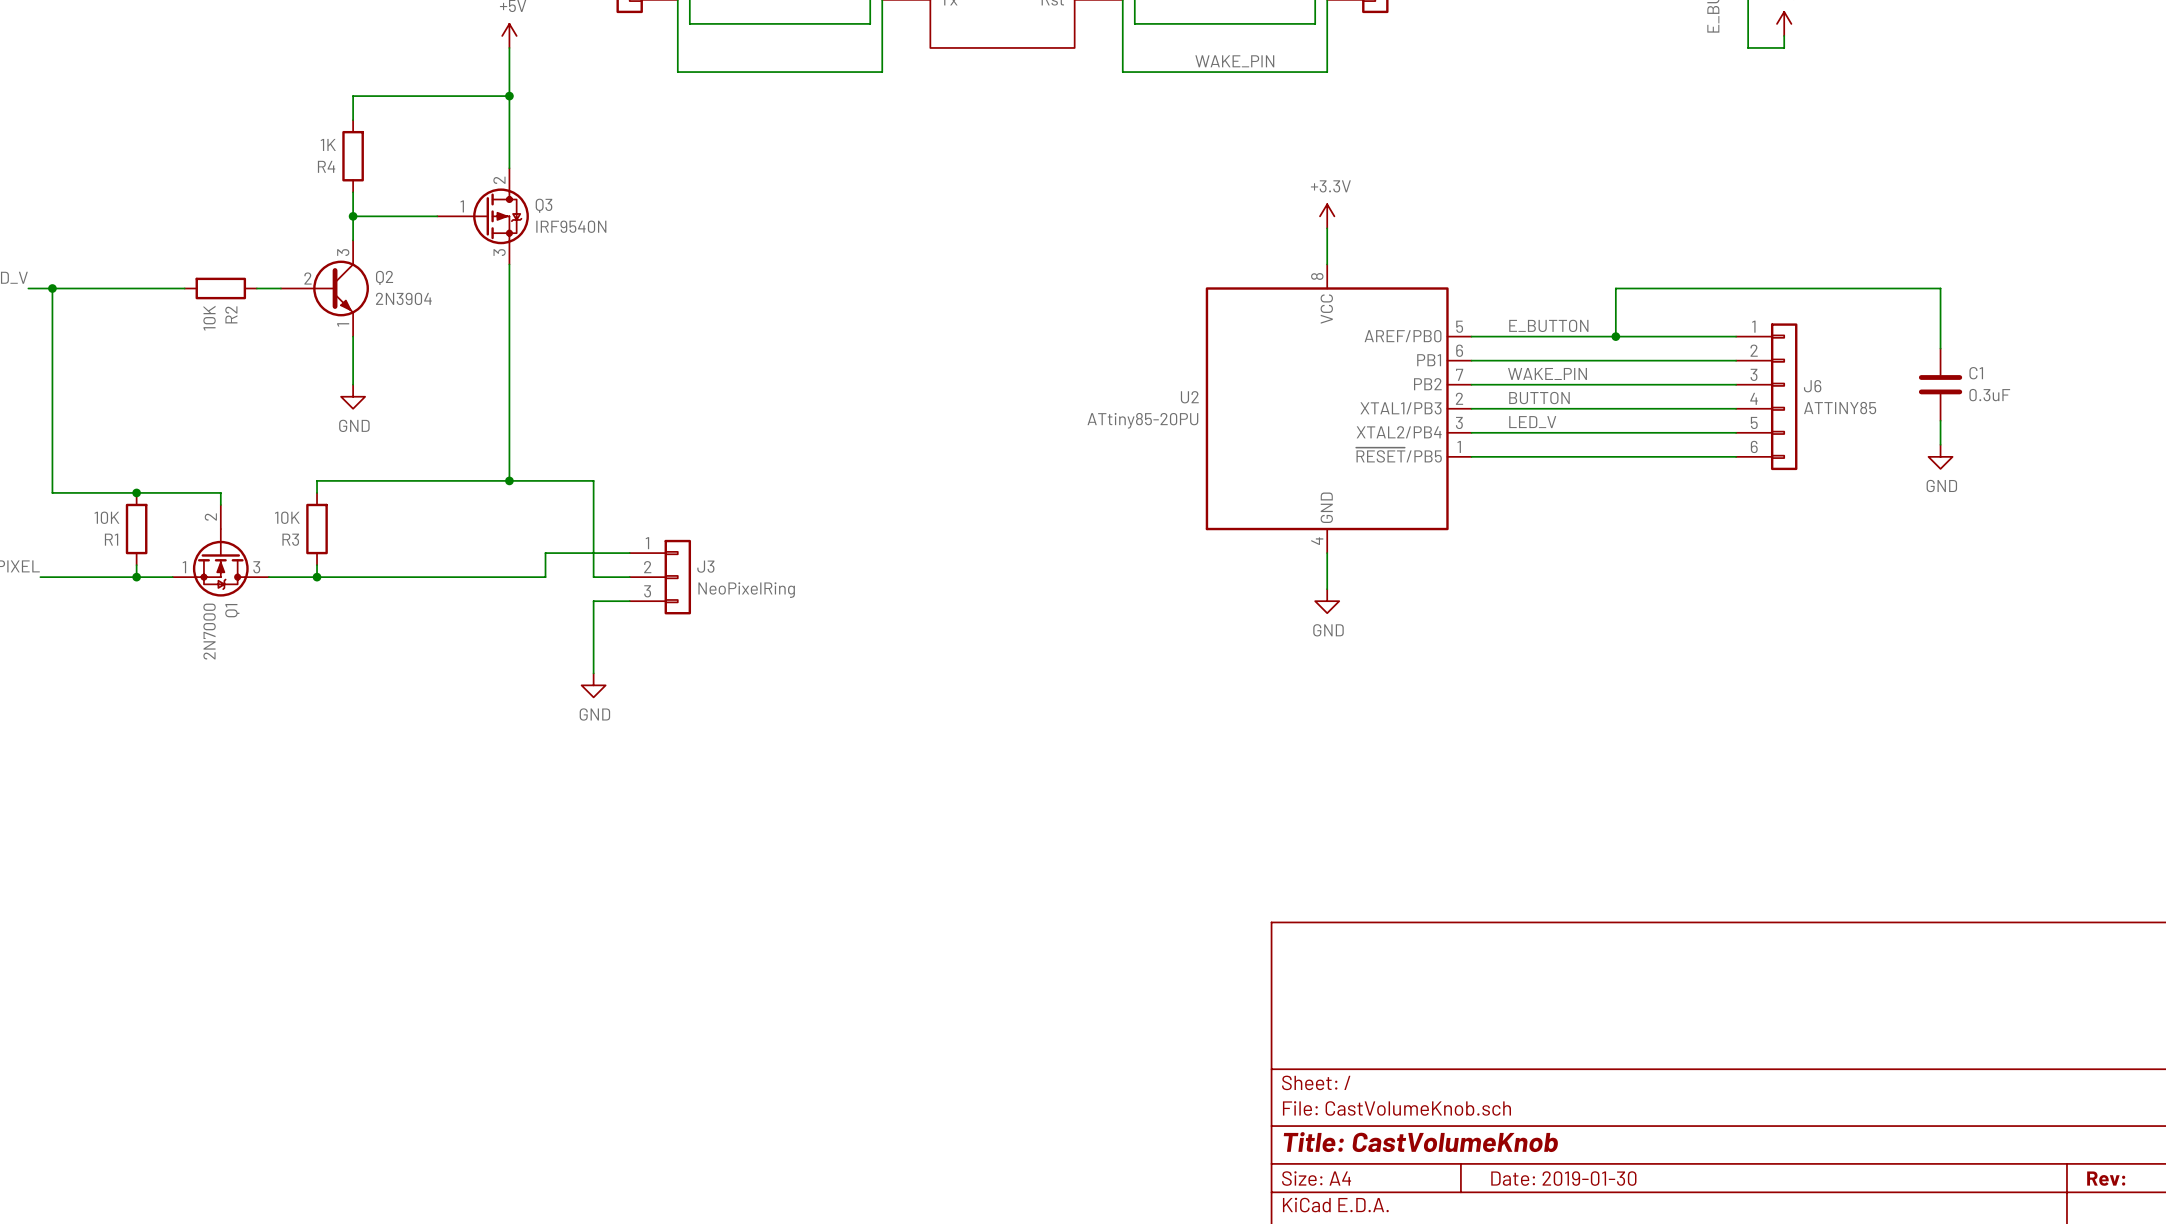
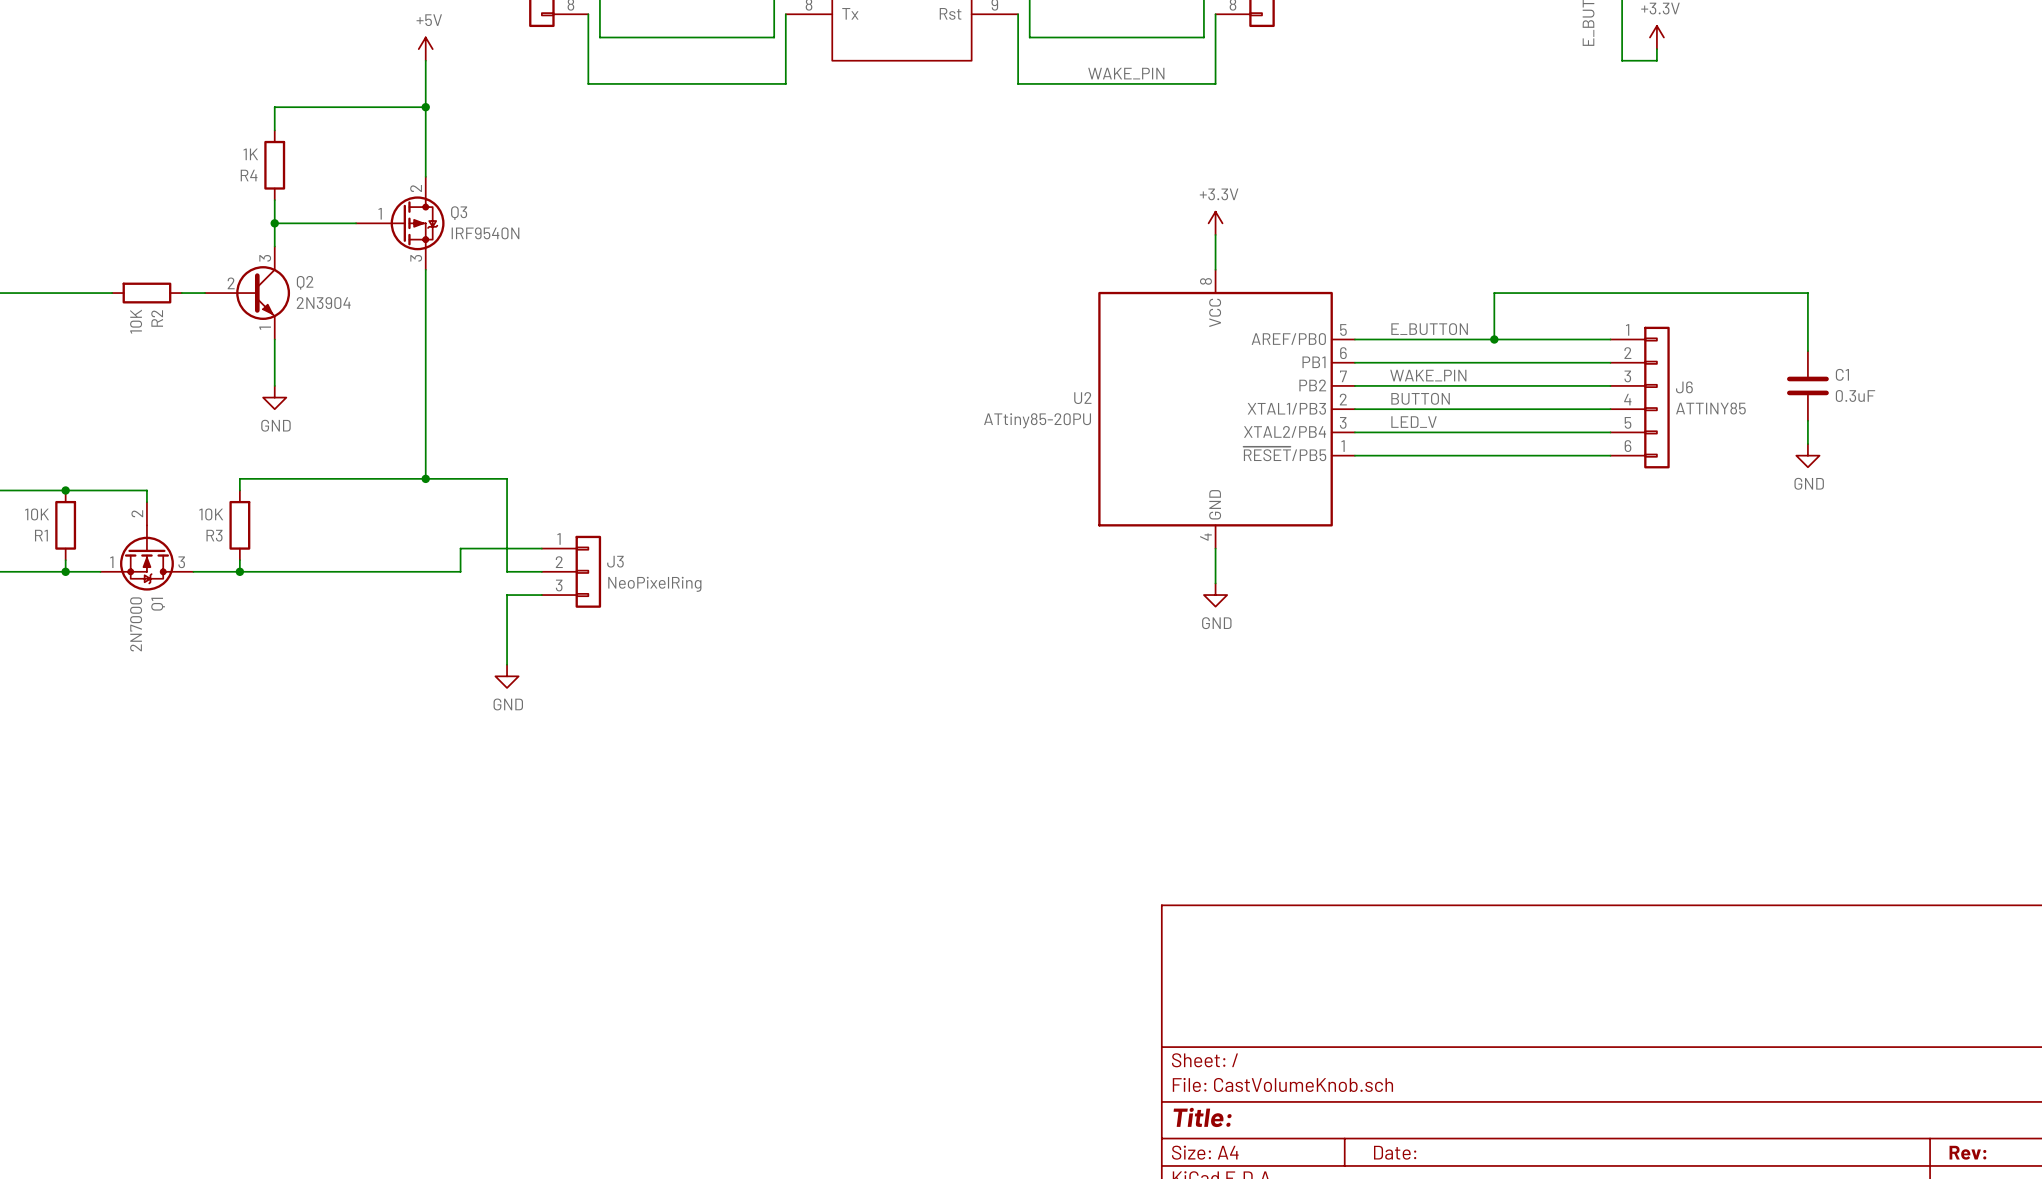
title block: Title: CastVolumeKnob (1420, 1142) -> Title: (1202, 1117)
title block: Date: 2019-01-30 (1563, 1178) -> Date: (1395, 1152)

